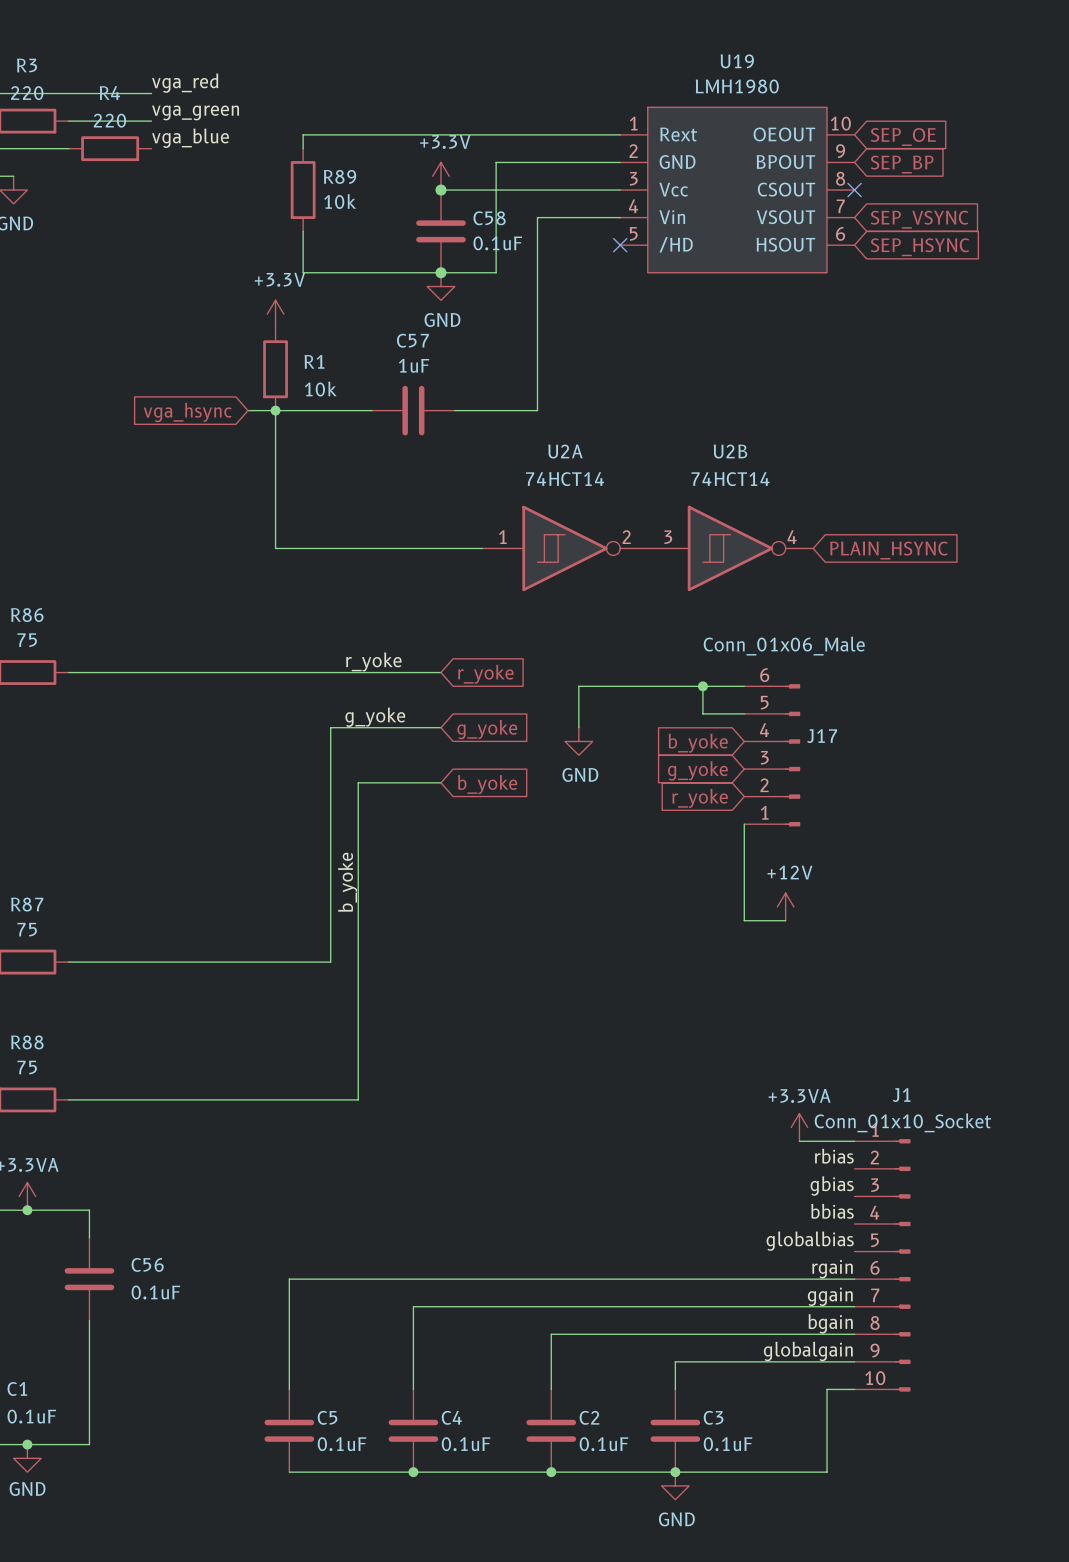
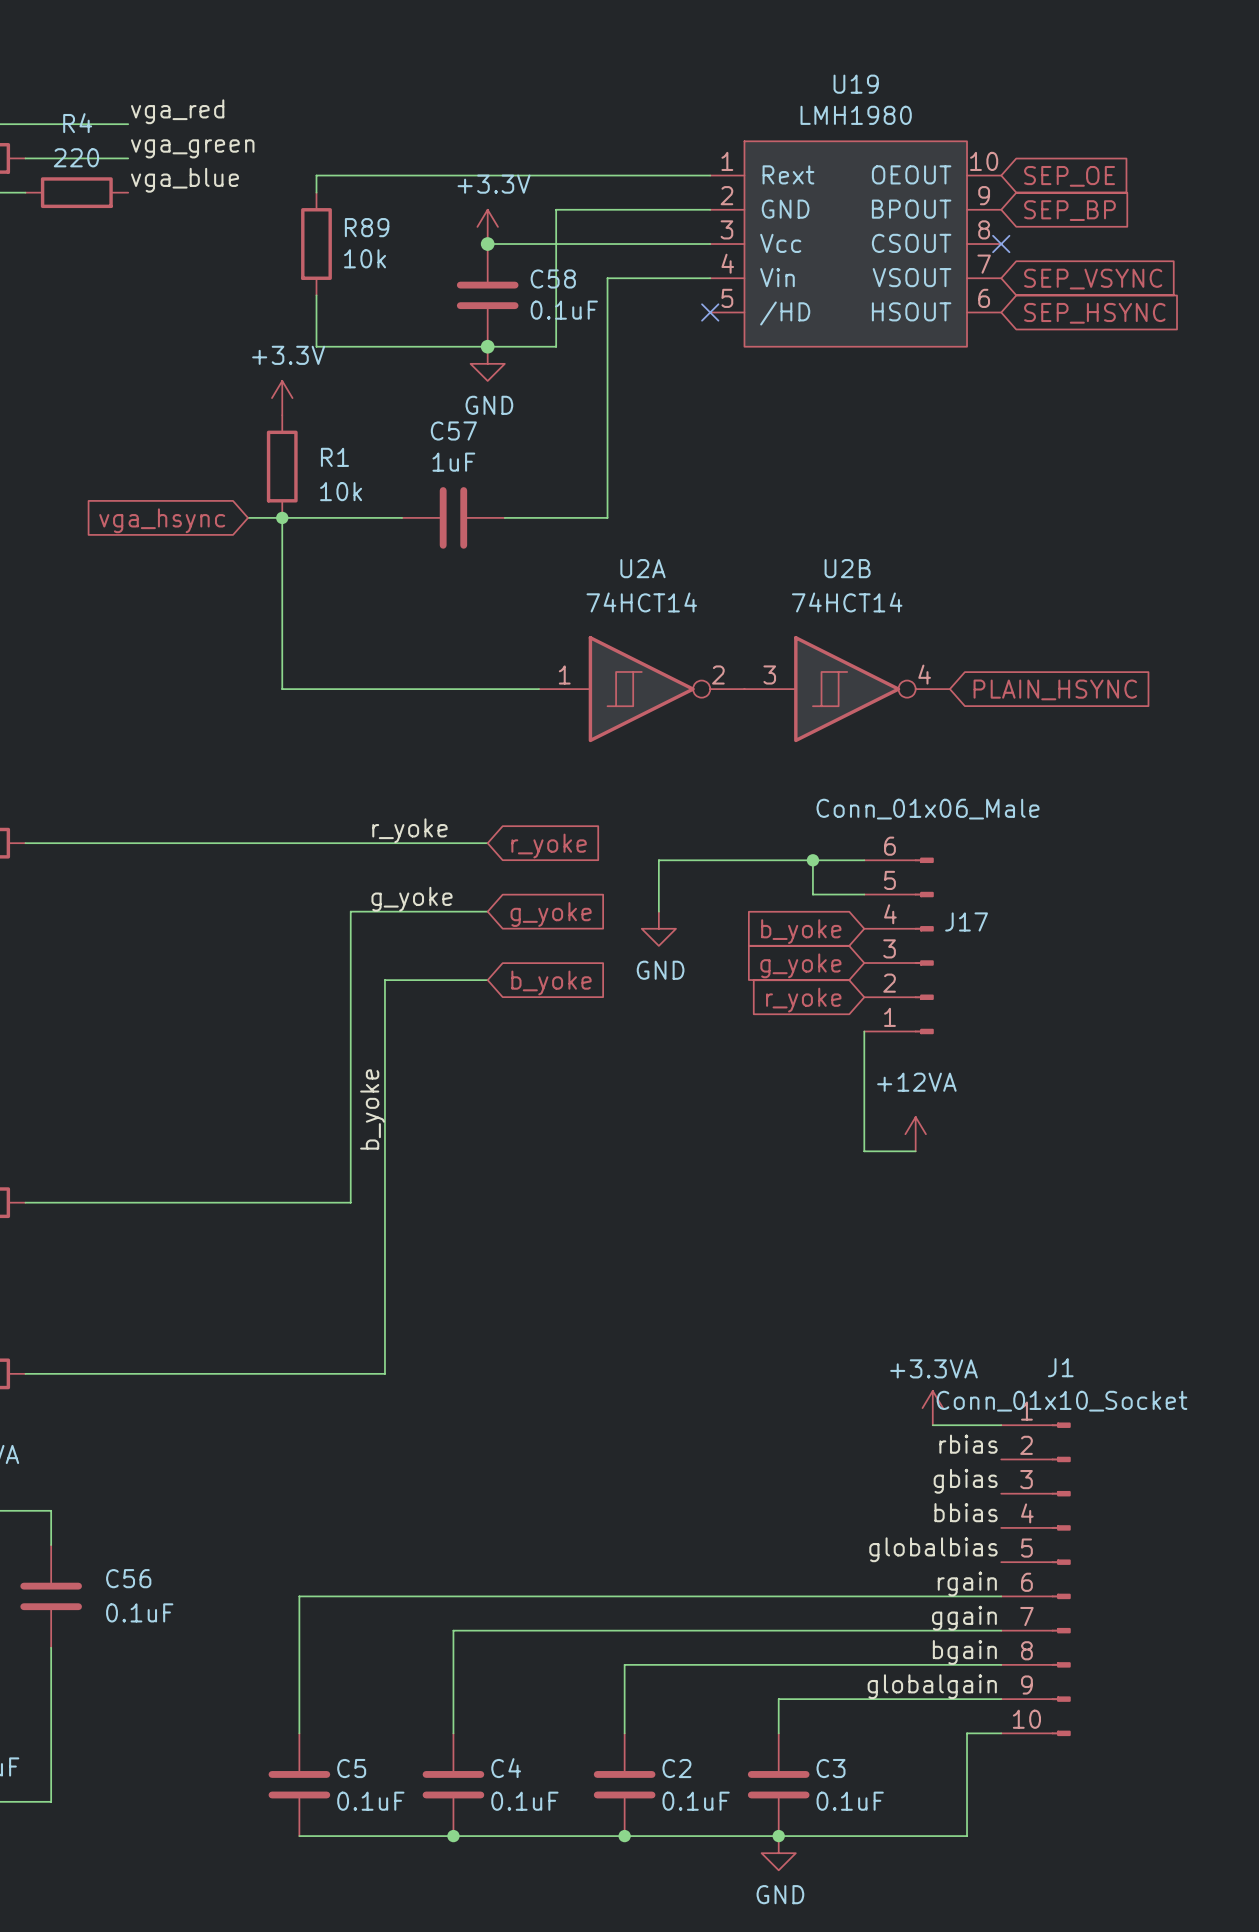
power symbol: +12V (785, 906) -> +12VA (915, 1134)

